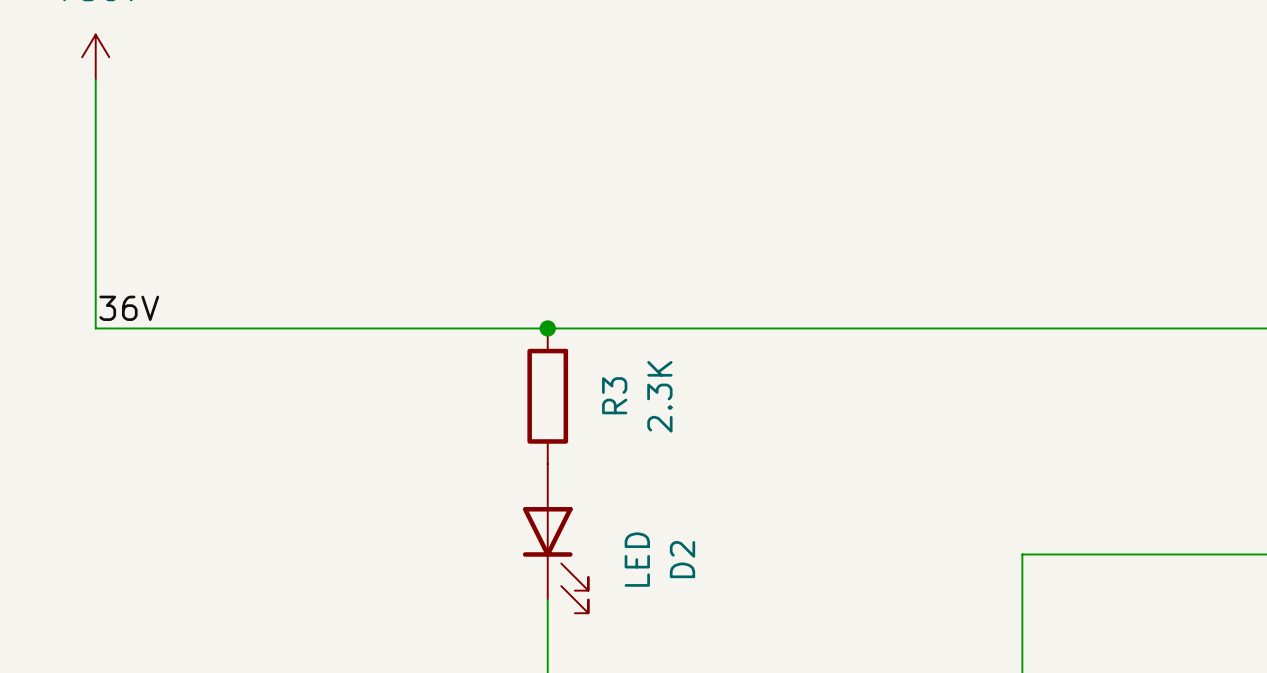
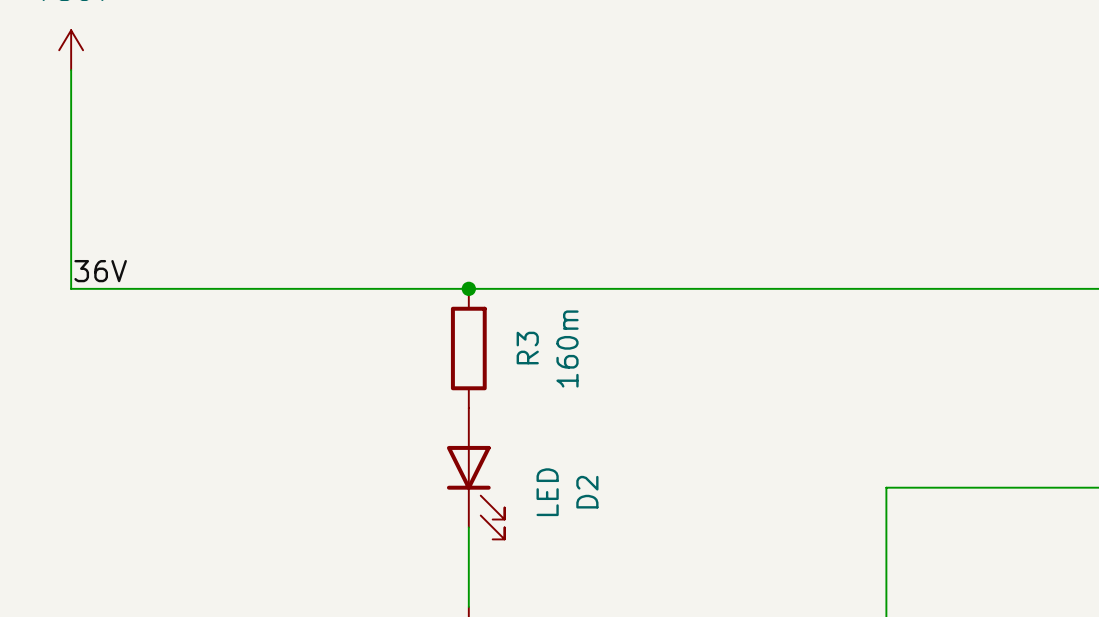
R3 value: 2.3K (659, 396) -> 160m (567, 348)

